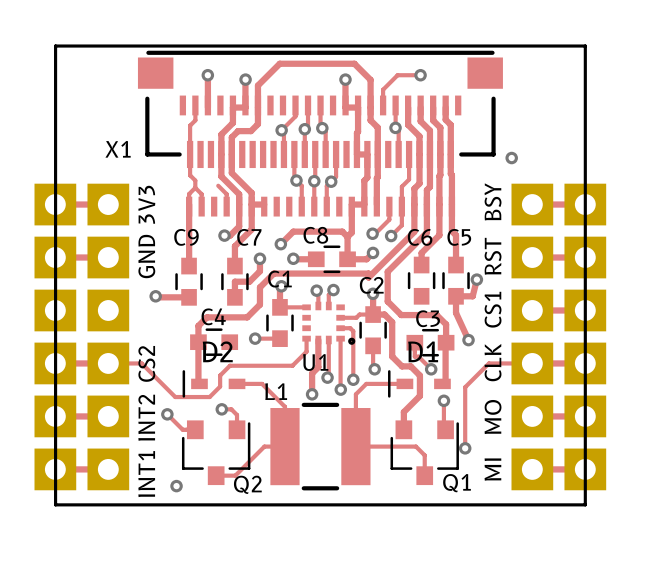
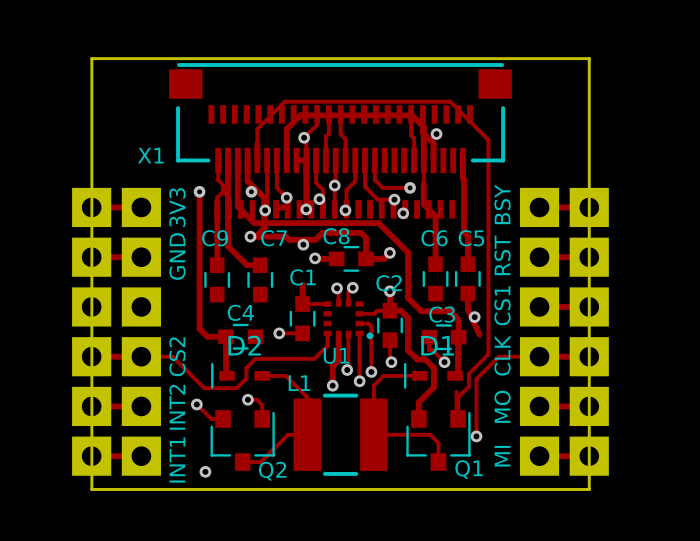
track: (207, 75) (207, 107) -> none
via: (207, 75) -> none
track: (420, 75) (397, 75) (383, 89) (383, 107) -> none
via: (420, 75) -> none
track: (245, 79) (245, 107) (232, 107) (232, 122) (221, 134) (221, 154) -> none
via: (245, 79) -> none
track: (345, 79) (345, 107) (358, 107) (356, 154) (367, 154) (364, 204) (351, 204) (351, 232) (347, 236) -> none
via: (345, 79) -> none
track: (195, 107) (195, 120) (190, 125) (190, 154) -> none
track: (420, 107) (420, 121) (429, 130) (429, 187) (426, 190) (426, 232) (387, 271) (387, 301) (401, 315) (406, 315) -> (237, 160) (237, 206) (254, 223) (378, 223) (408, 252) (408, 298) (421, 311)
track: (433, 107) (433, 120) (440, 127) (439, 235) (421, 253) -> none
track: (445, 107) (445, 119) (450, 124) (450, 154) -> none
via: none -> (436, 134)
via: (395, 127) -> none
via: (322, 128) -> none
via: (304, 129) -> none
track: (231, 137) (238, 131) (250, 131) (257, 124) (257, 85) (279, 63) (354, 63) (370, 79) (370, 120) (377, 127) (376, 204) -> (257, 144) (257, 129) (284, 101) (450, 101) (488, 139) (488, 354) (468, 373) (468, 386) (458, 397) (458, 418)
track: (231, 154) (231, 173) (251, 192) (251, 229) (234, 246) (234, 266) -> (227, 160) (227, 246) (247, 265) (260, 265)
track: none -> (267, 160) (267, 208) (265, 210)
track: none -> (276, 160) (276, 187) (286, 197)
track: none -> (286, 160) (286, 129) (300, 115) (412, 115) (423, 127) (423, 160)
track: none -> (296, 160) (306, 160) (306, 209)
track: none -> (365, 160) (365, 186) (377, 199) (394, 199)
track: none -> (374, 160) (374, 180) (382, 187) (410, 187)
track: (419, 154) (419, 183) (414, 188) (414, 231) (368, 277) (368, 273) (273, 273) (259, 287) (259, 304) (247, 317) (206, 317) (198, 325) (198, 342) -> (199, 191) (199, 328) (207, 336) (225, 336)
via: (511, 158) -> none
track: (409, 179) (401, 186) (401, 225) (391, 236) -> (423, 183) (423, 204) (435, 216) (435, 253)
via: (296, 180) -> none
via: (331, 181) -> none
via: none -> (410, 187)
track: (218, 185) (226, 194) (226, 204) -> none
via: none -> (199, 191)
via: none -> (251, 191)
via: none -> (286, 197)
via: none -> (319, 199)
via: none -> (394, 199)
track: (389, 204) (389, 219) (375, 233) (372, 233) -> none
via: none -> (306, 209)
via: none -> (265, 210)
via: none -> (345, 210)
via: none -> (403, 213)
track: (301, 231) (293, 231) (280, 244) -> (322, 232) (315, 239) (289, 239) (286, 236) (255, 236)
via: (372, 233) -> none
via: (391, 236) -> none
track: (259, 258) (259, 271) (249, 281) (234, 281) (234, 297) -> none
via: (259, 258) -> none
track: (476, 279) (472, 296) (456, 296) -> none
via: (476, 279) -> none
via: (281, 286) -> none
track: (155, 296) (189, 297) -> none
via: (155, 296) -> none
via position: (468, 340) -> (474, 317)
via: (443, 400) -> none

